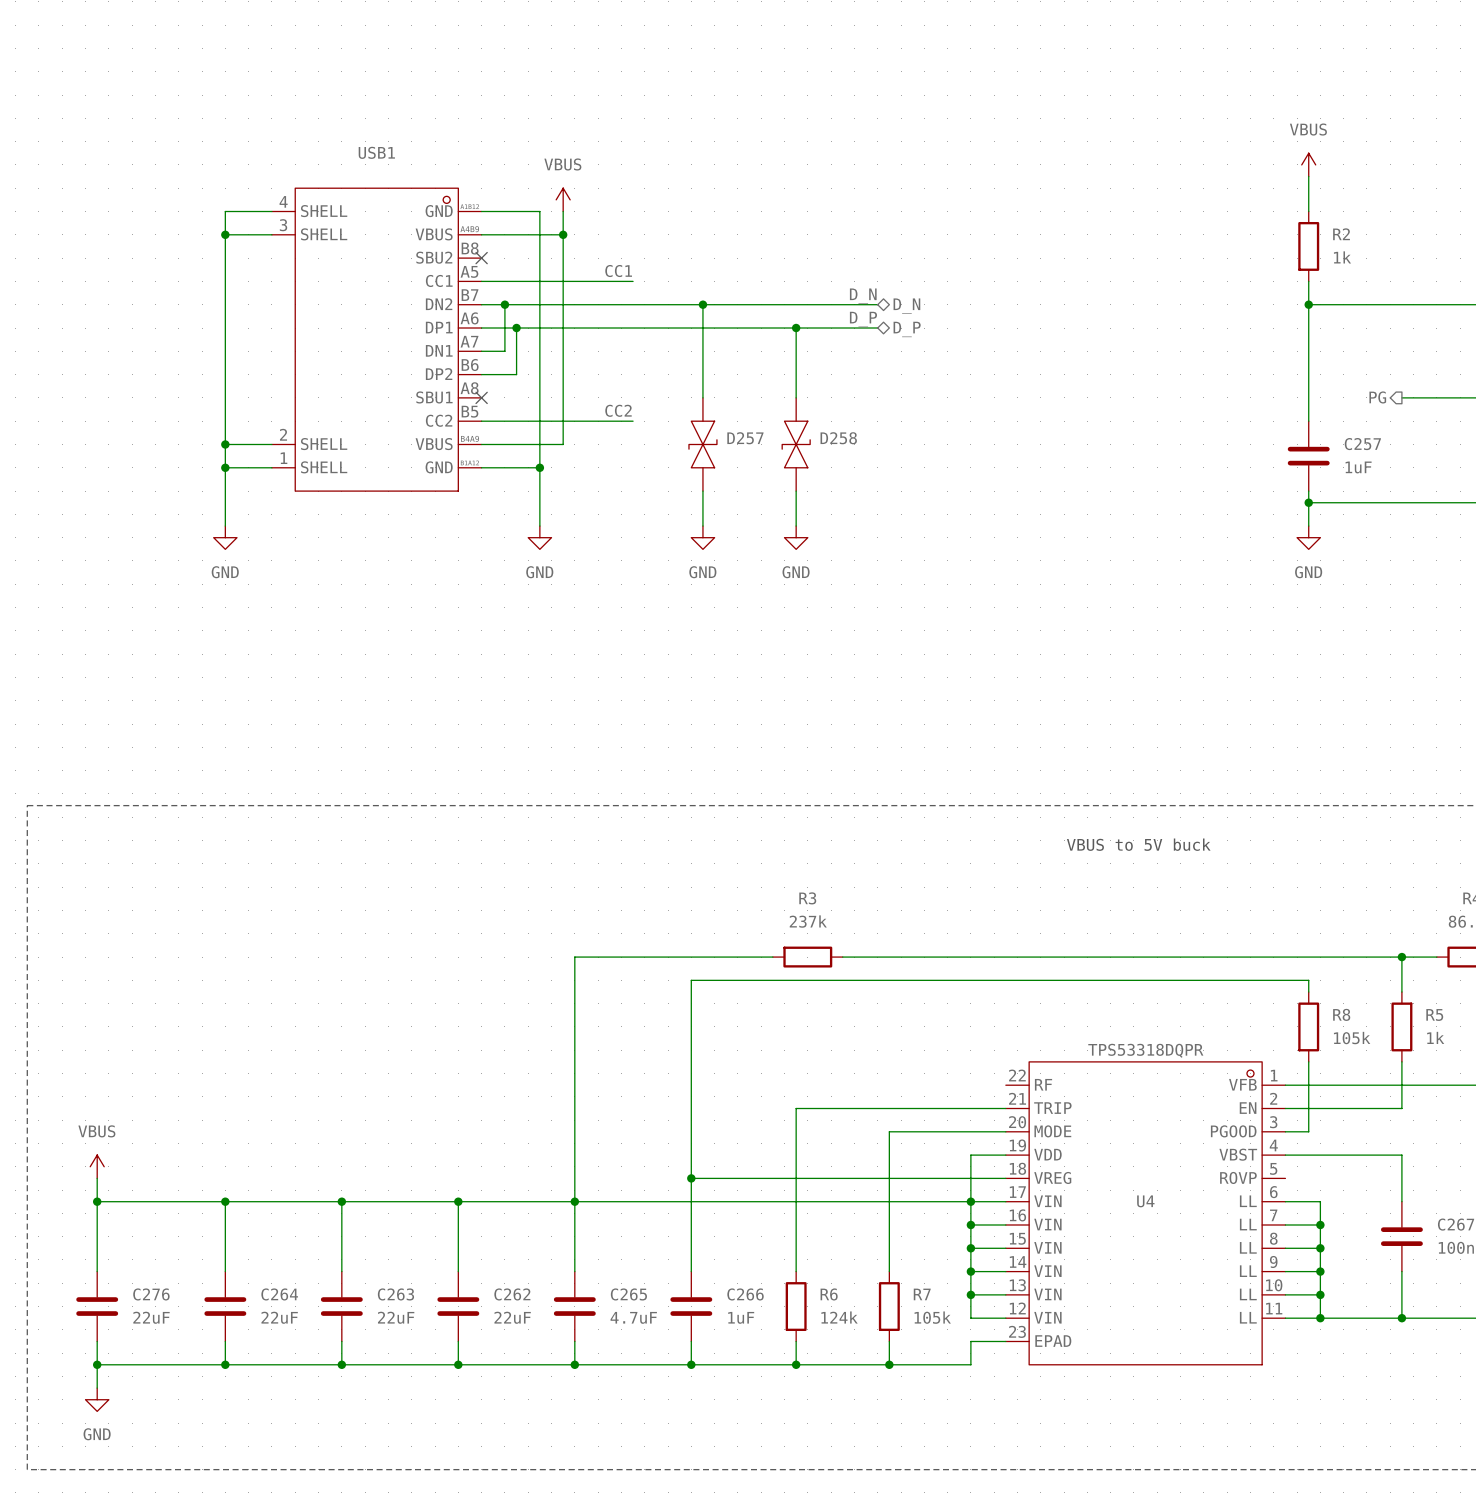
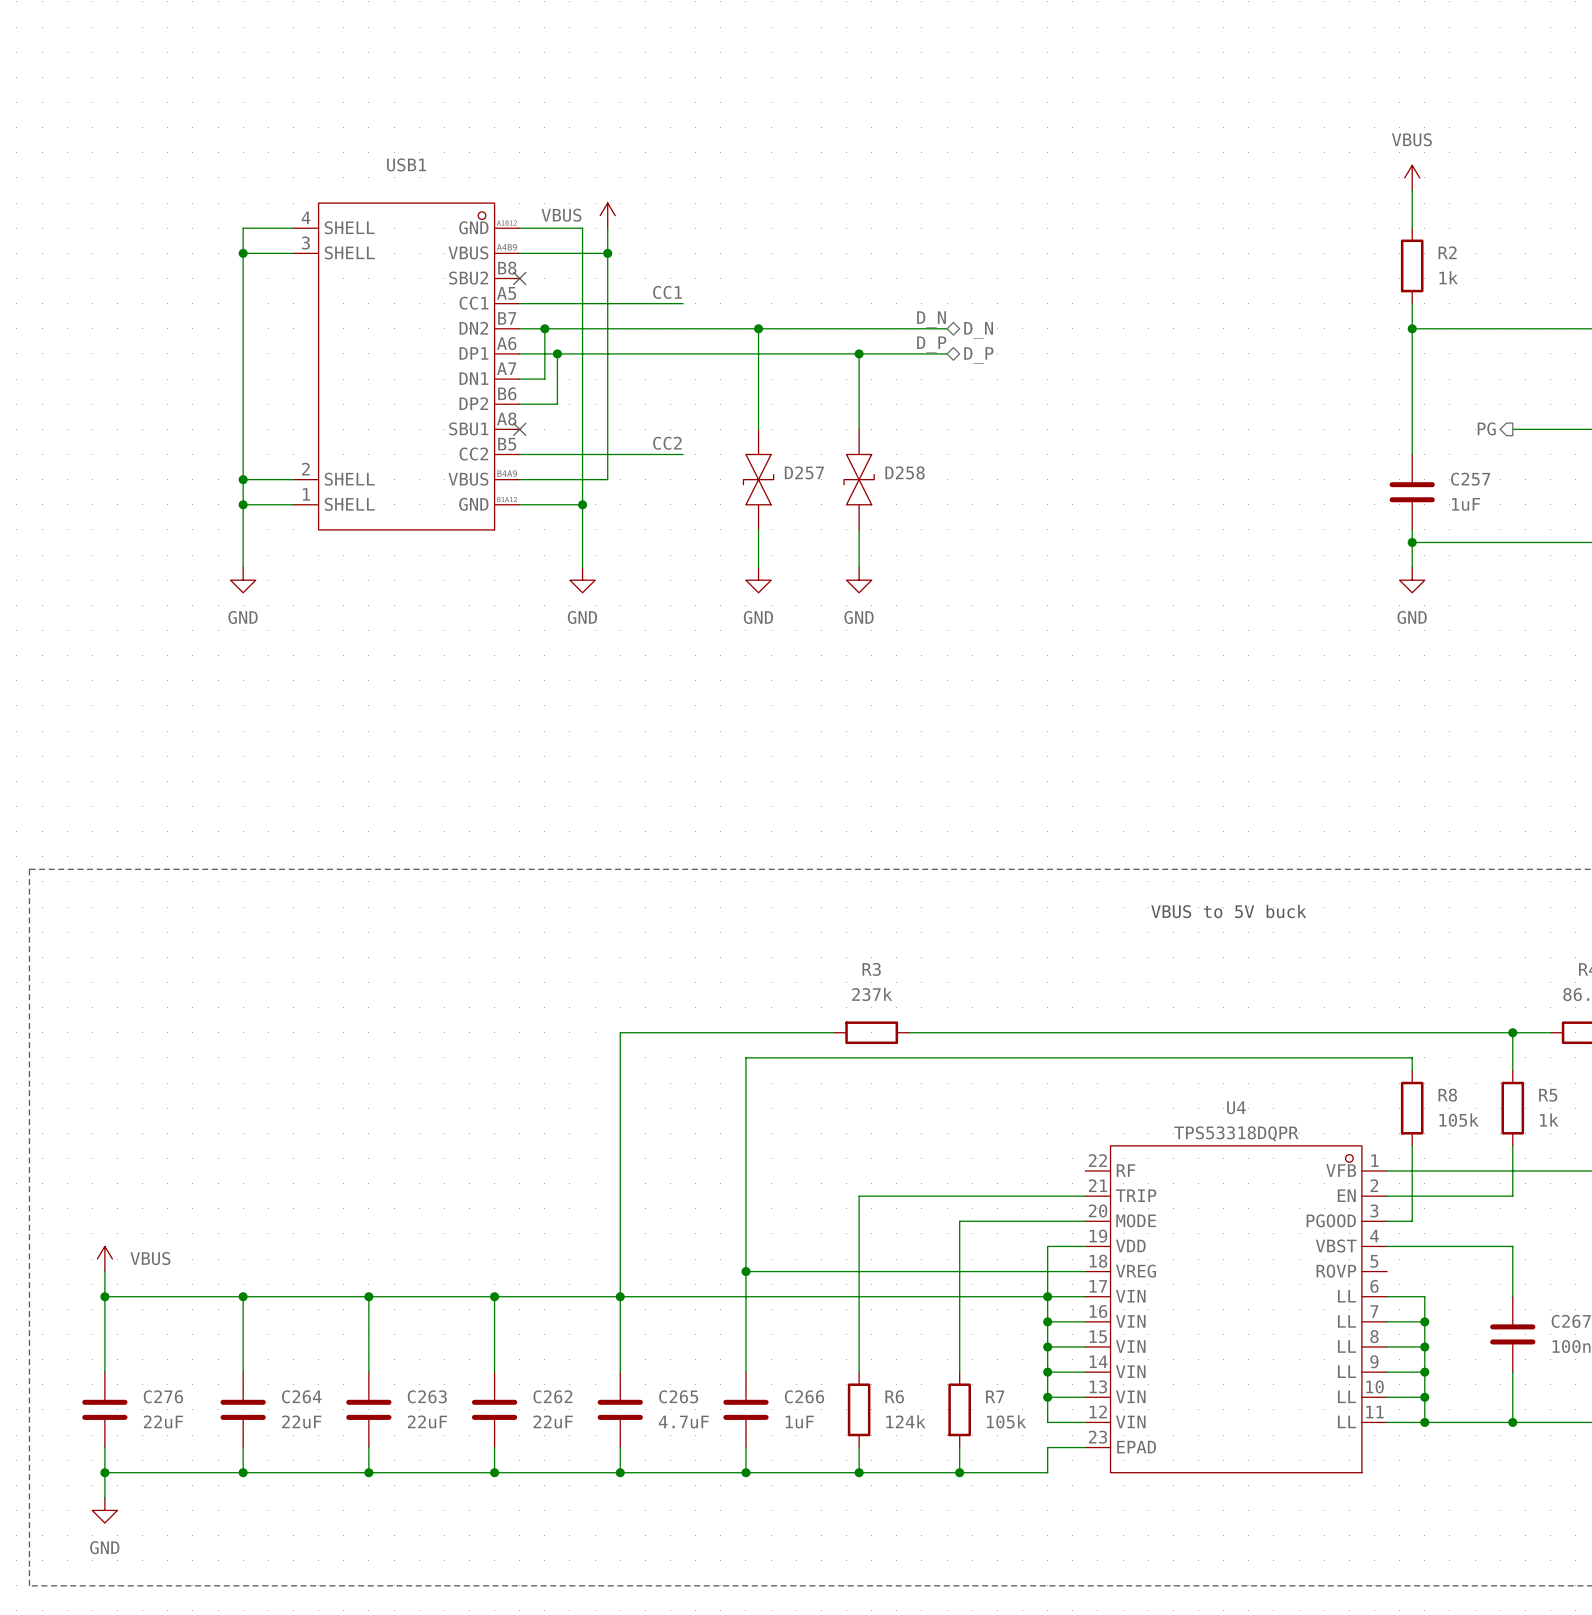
power symbol text position: VBUS (562, 164) -> VBUS (561, 215)
power symbol text position: VBUS (96, 1131) -> VBUS (150, 1258)
U4 name position: U4 (1145, 1201) -> U4 (1236, 1107)

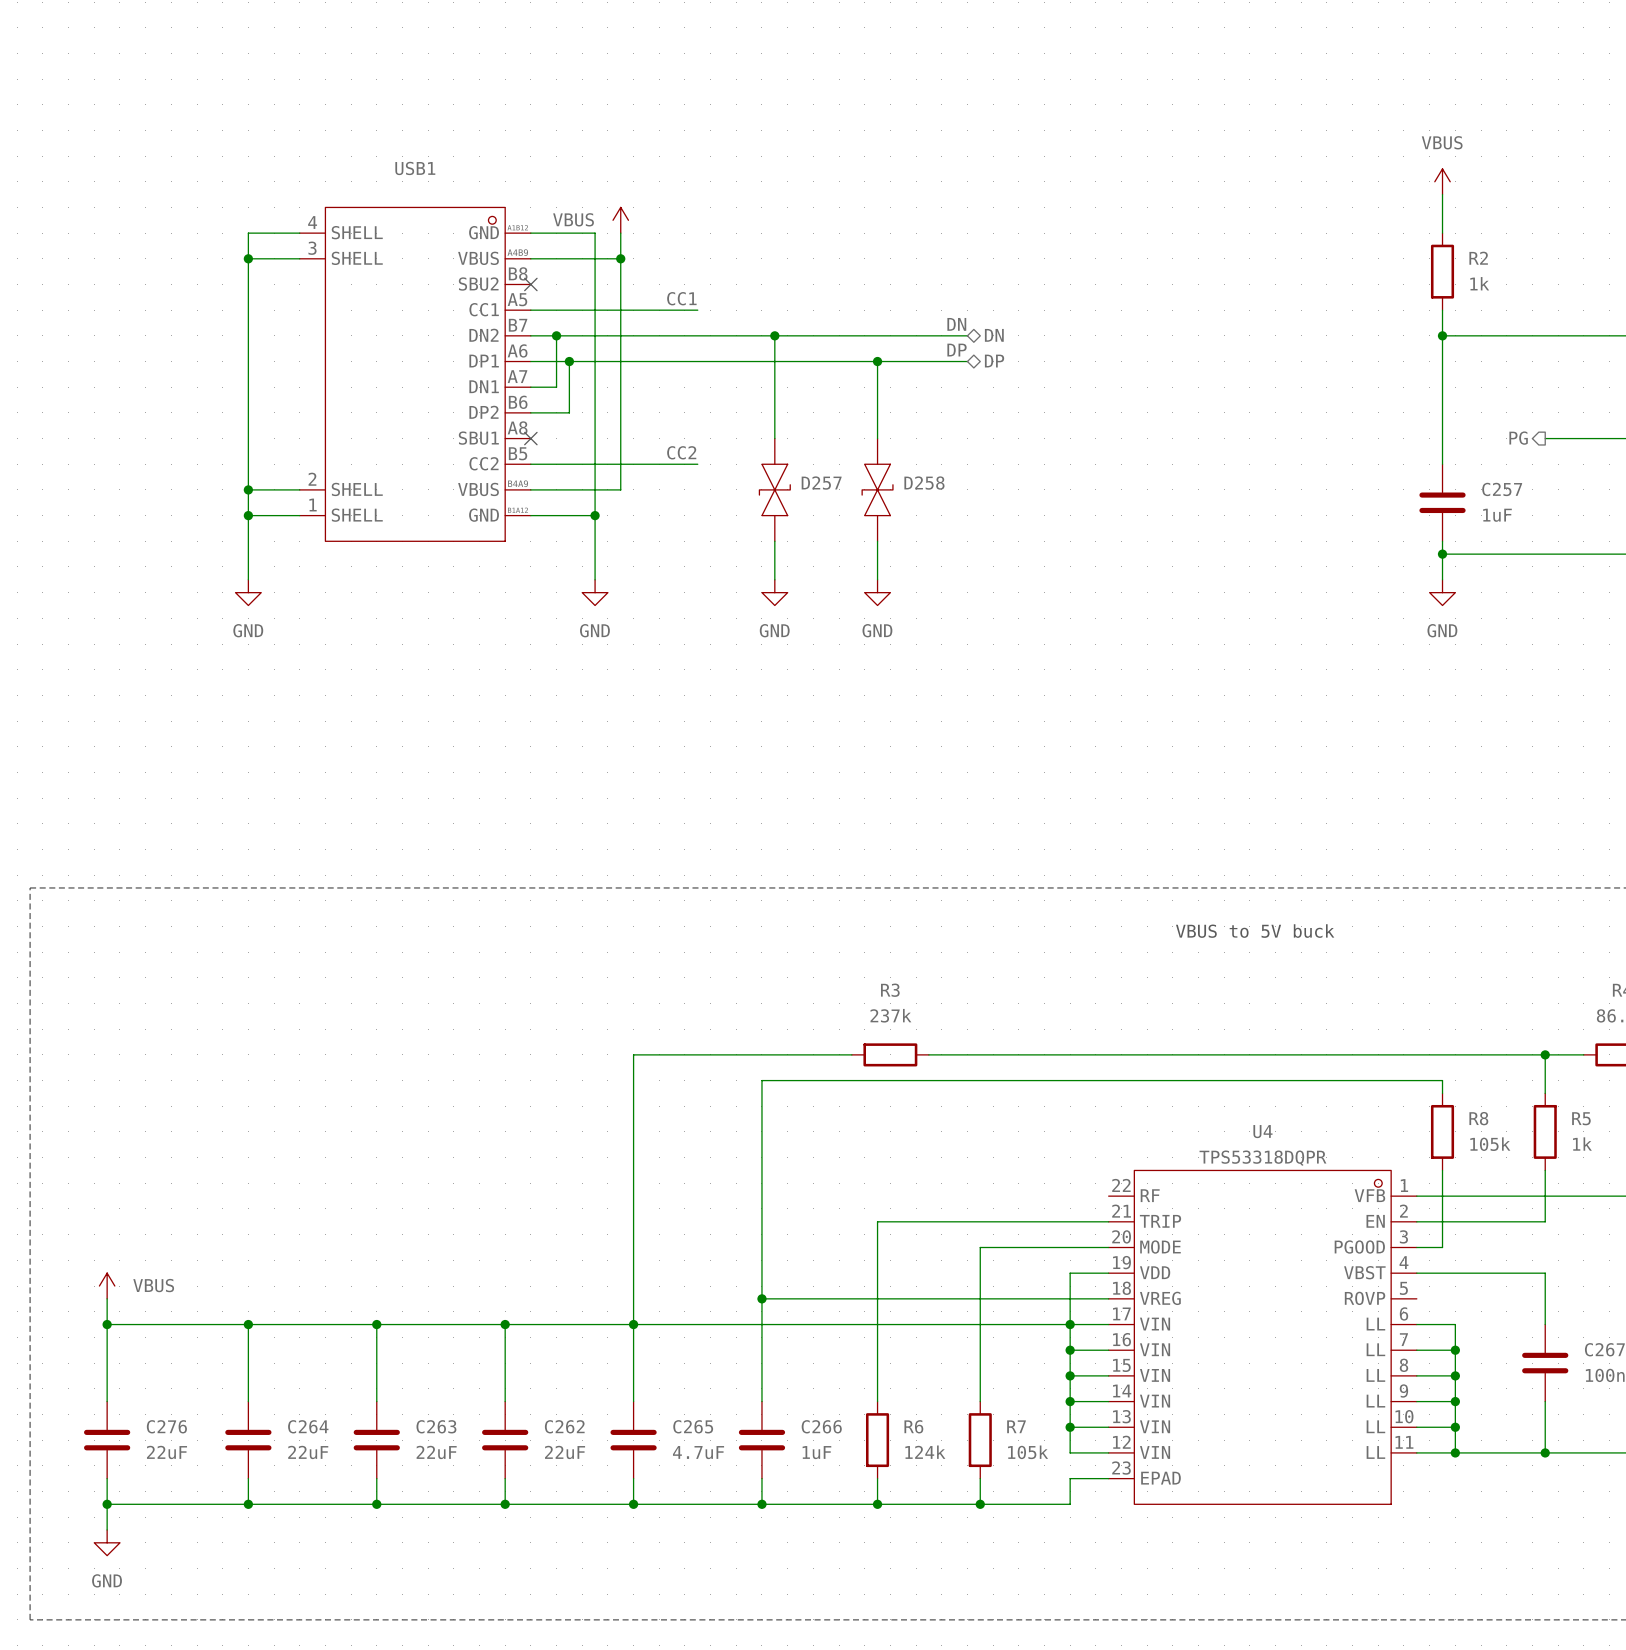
label: D_N (931, 319) -> DN (956, 324)
hierarchical label: D_N (978, 330) -> DN (994, 335)
label: D_P (931, 344) -> DP (957, 350)
hierarchical label: D_P (978, 355) -> DP (994, 361)

